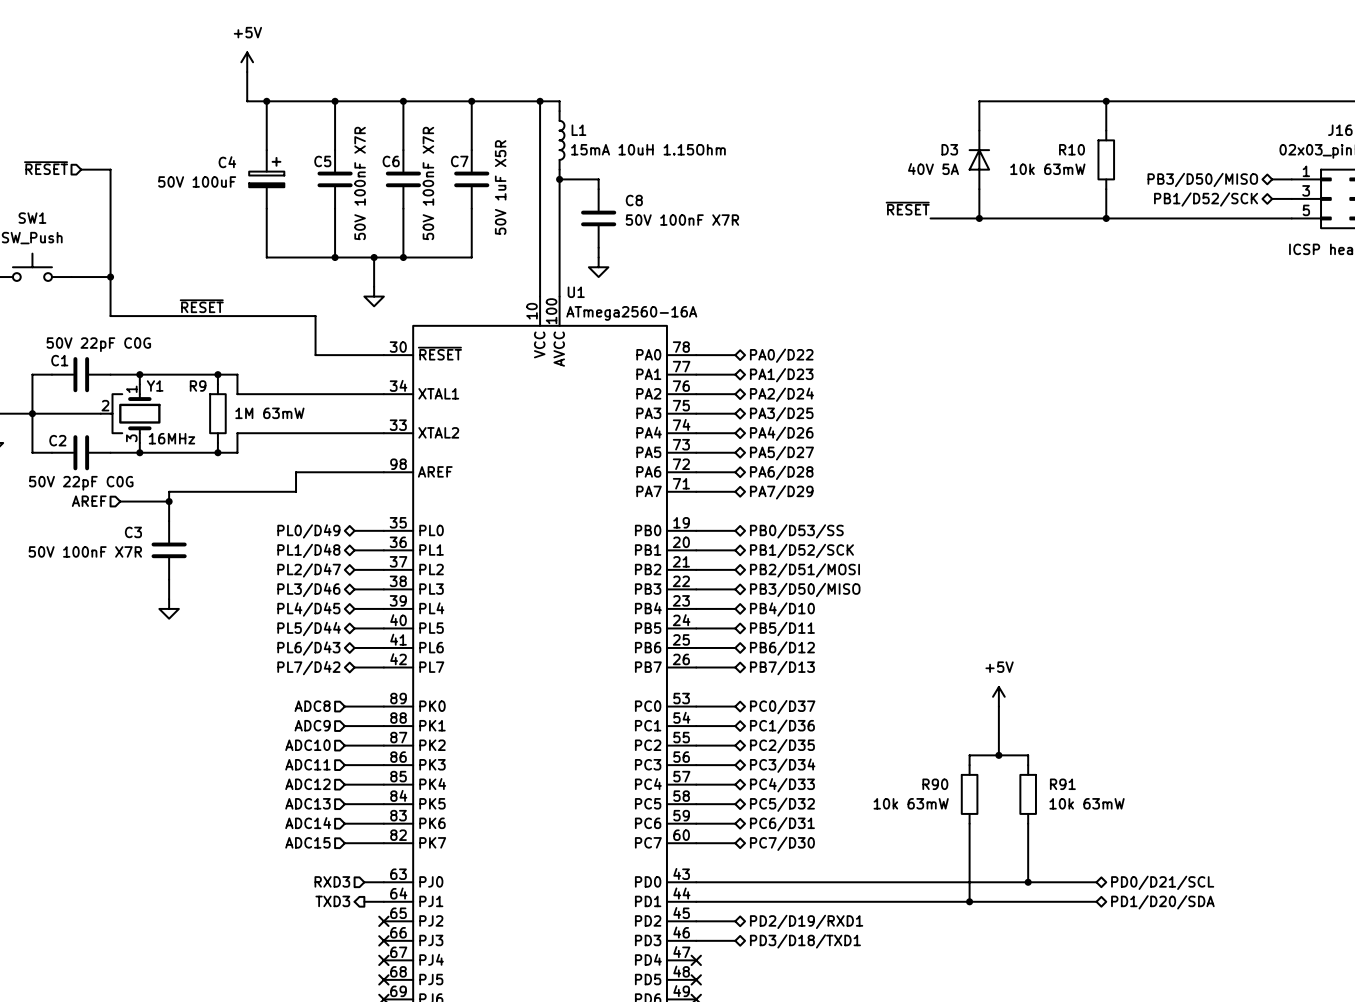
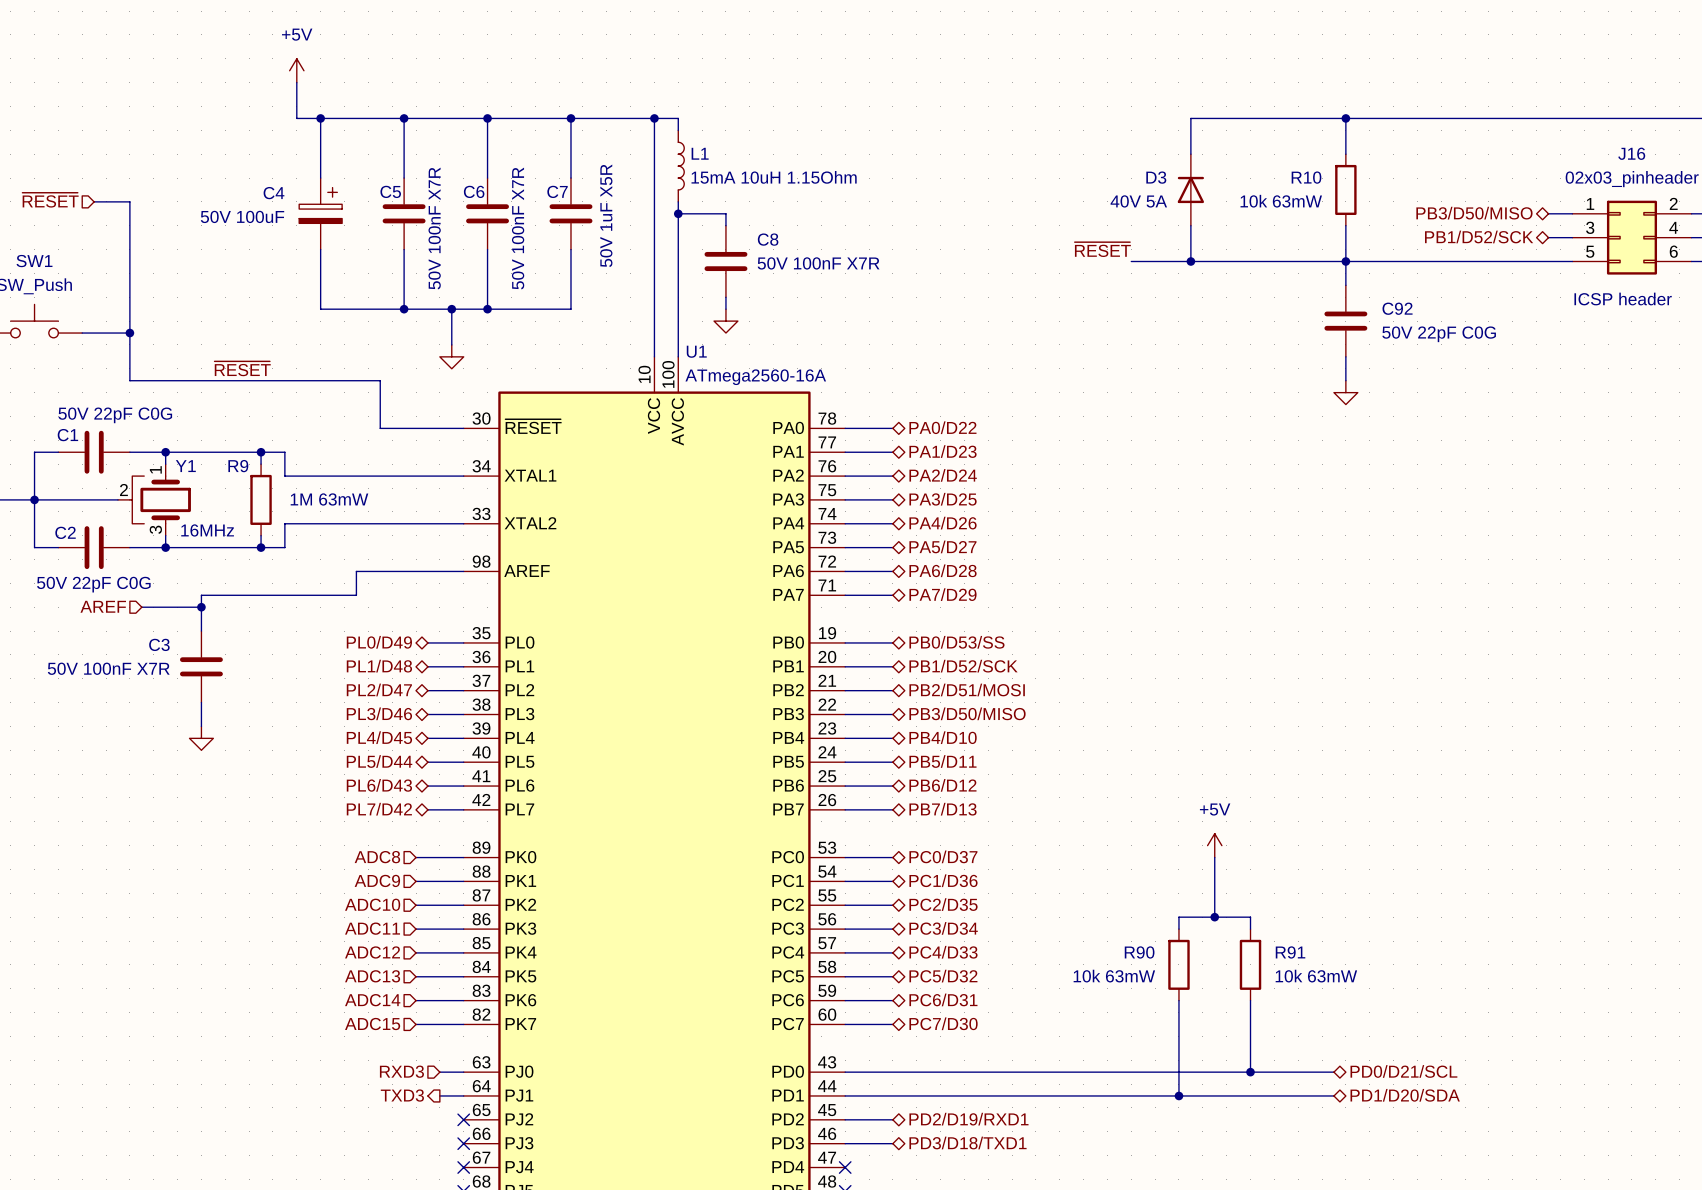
wire: none -> (1345, 261) (1345, 285)
C92: none -> 50V 22pF C0G (1345, 321)
wire: none -> (1345, 356) (1345, 380)
power symbol: none -> (1345, 392)

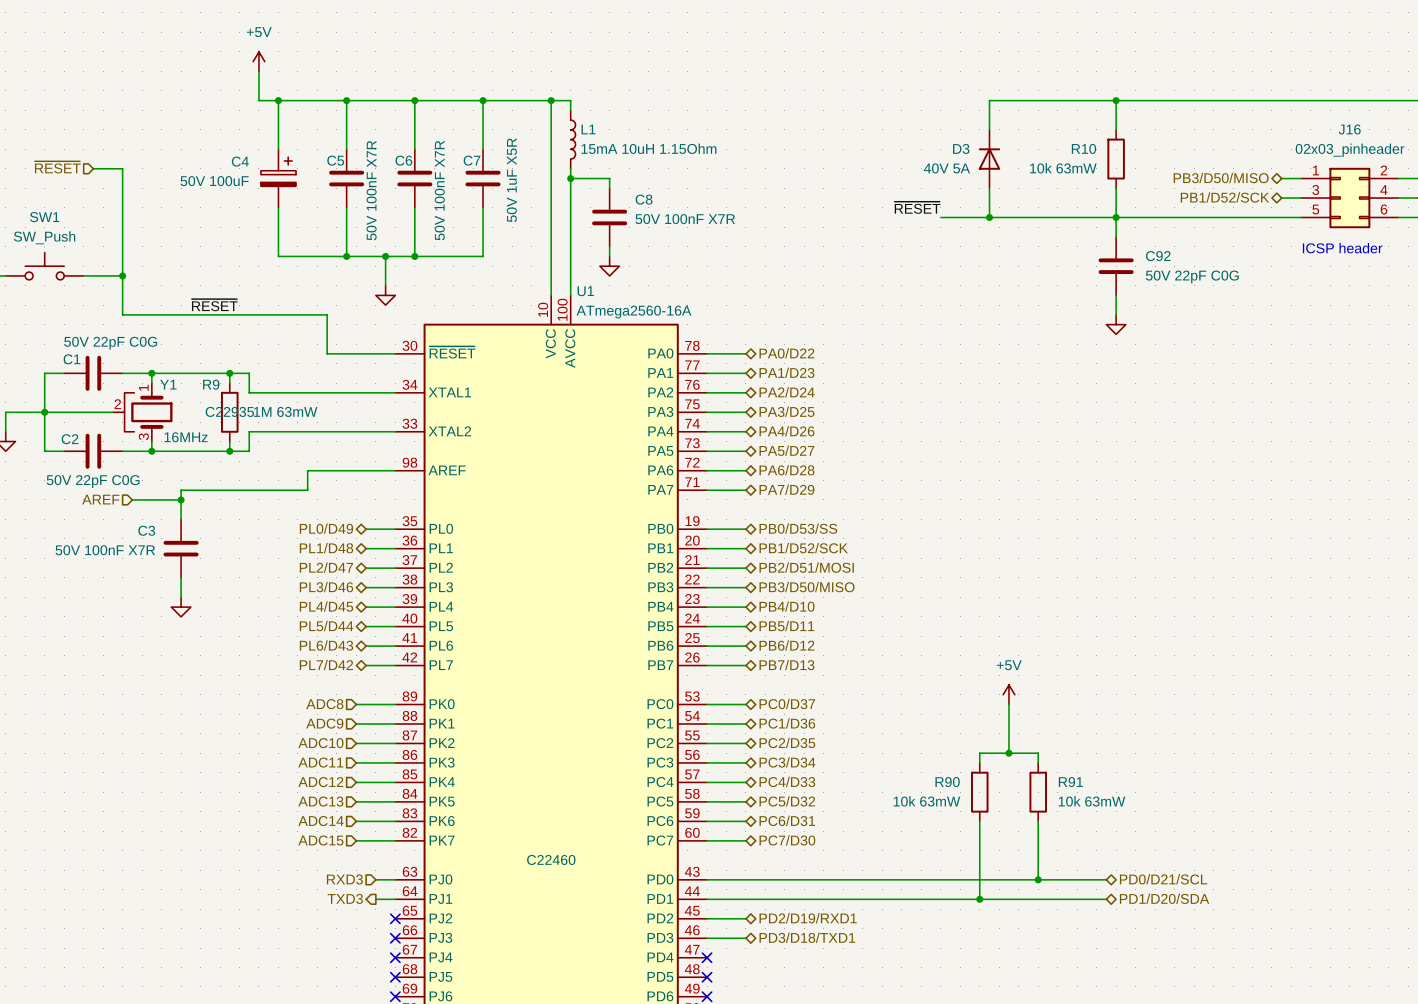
R9 text: none -> C22935 (229, 411)
U1 text: none -> C22460 (551, 859)

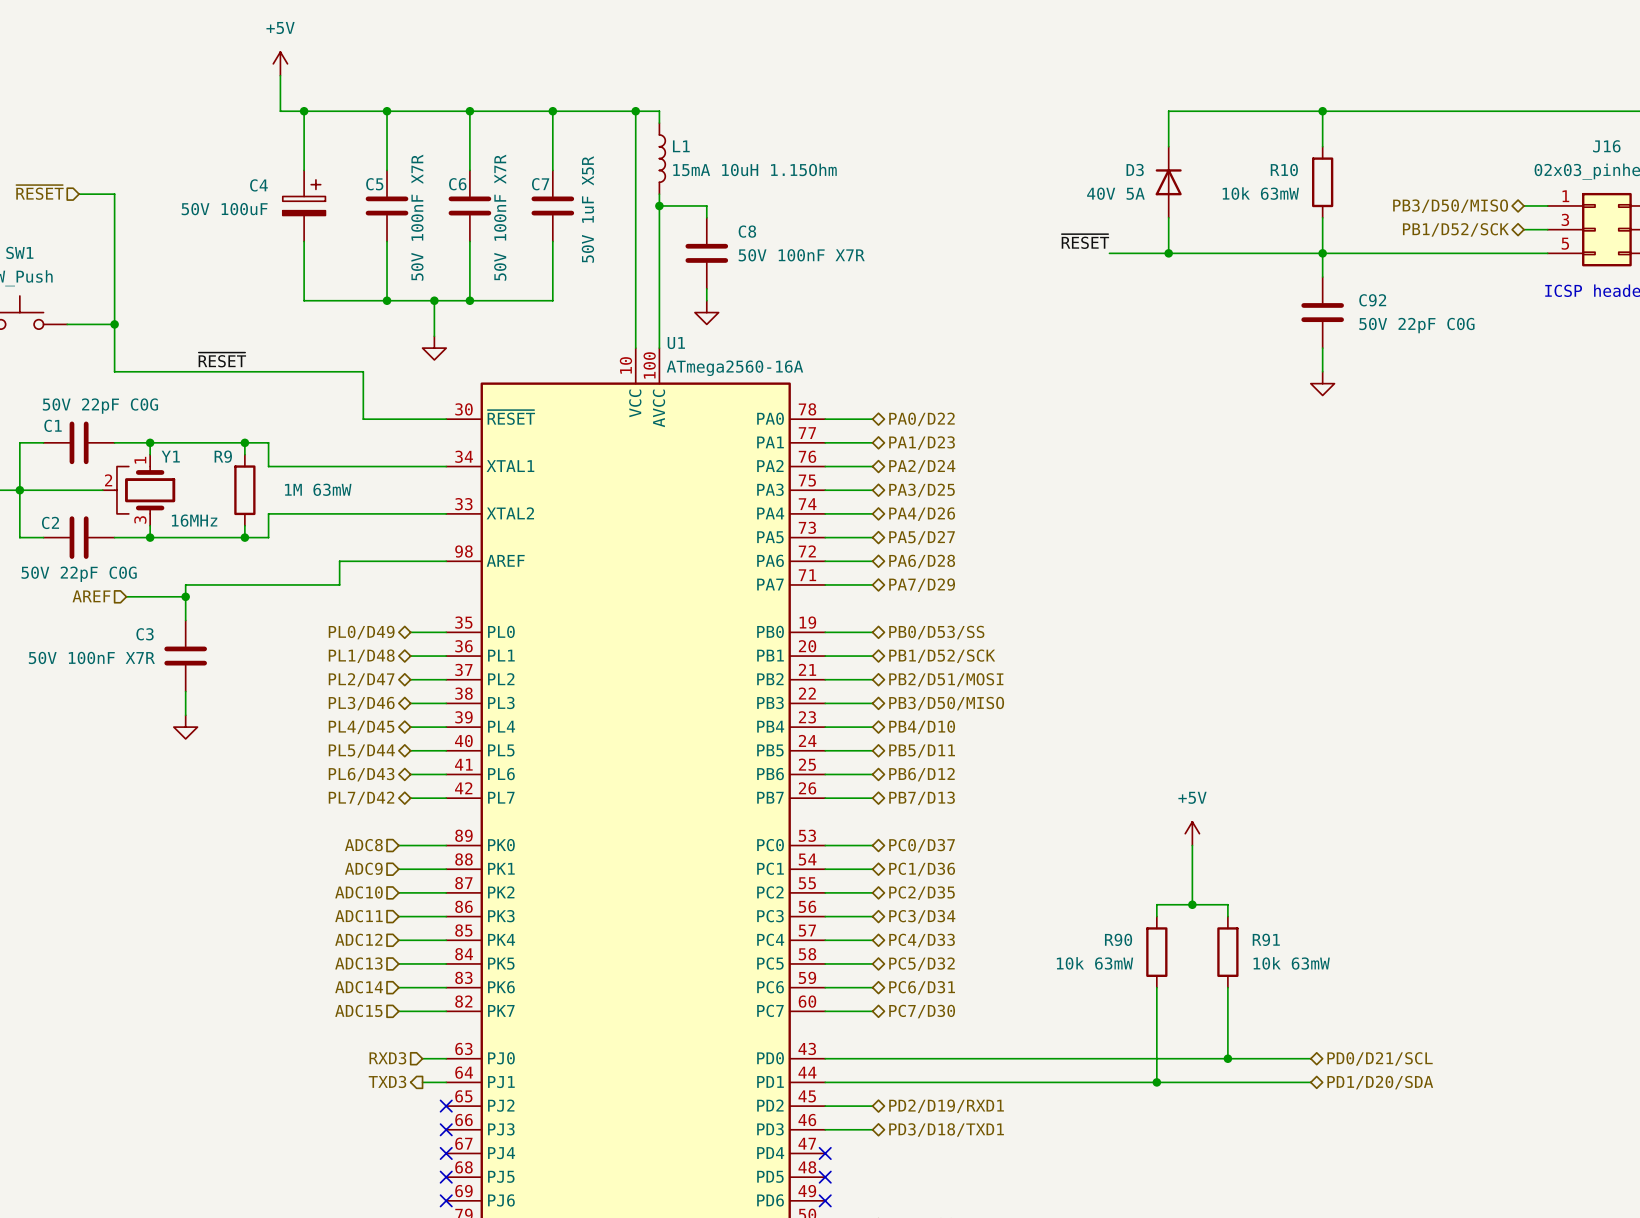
R9 text: C22935 (229, 411) -> none
U1 text: C22460 (551, 859) -> none

